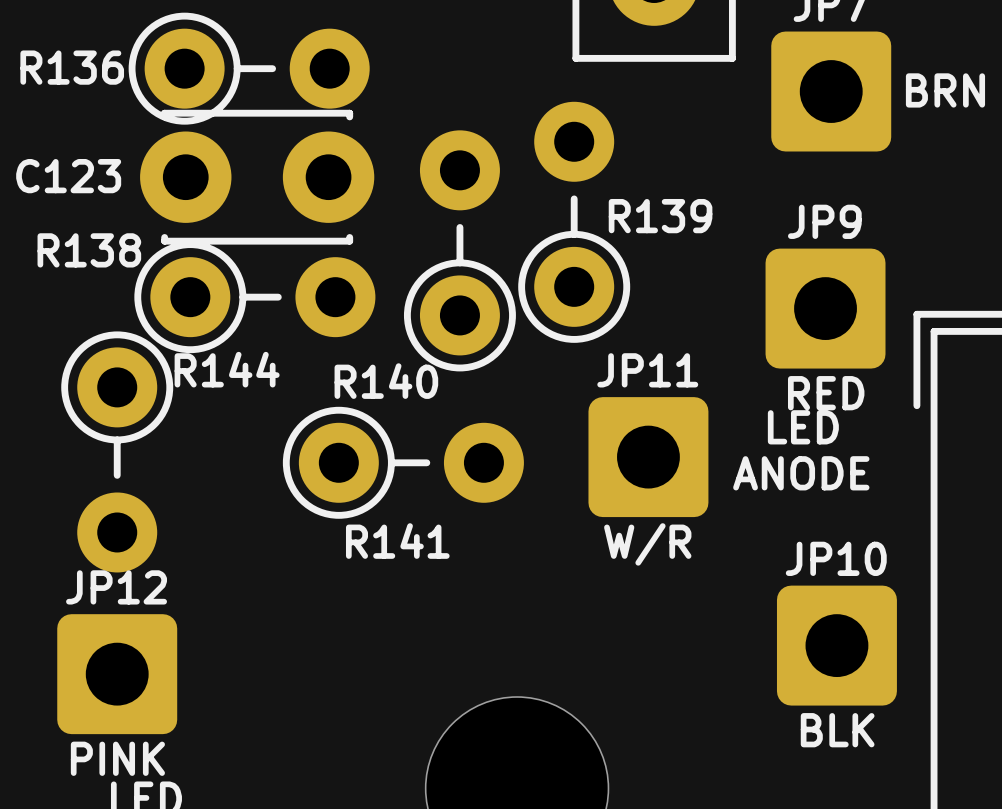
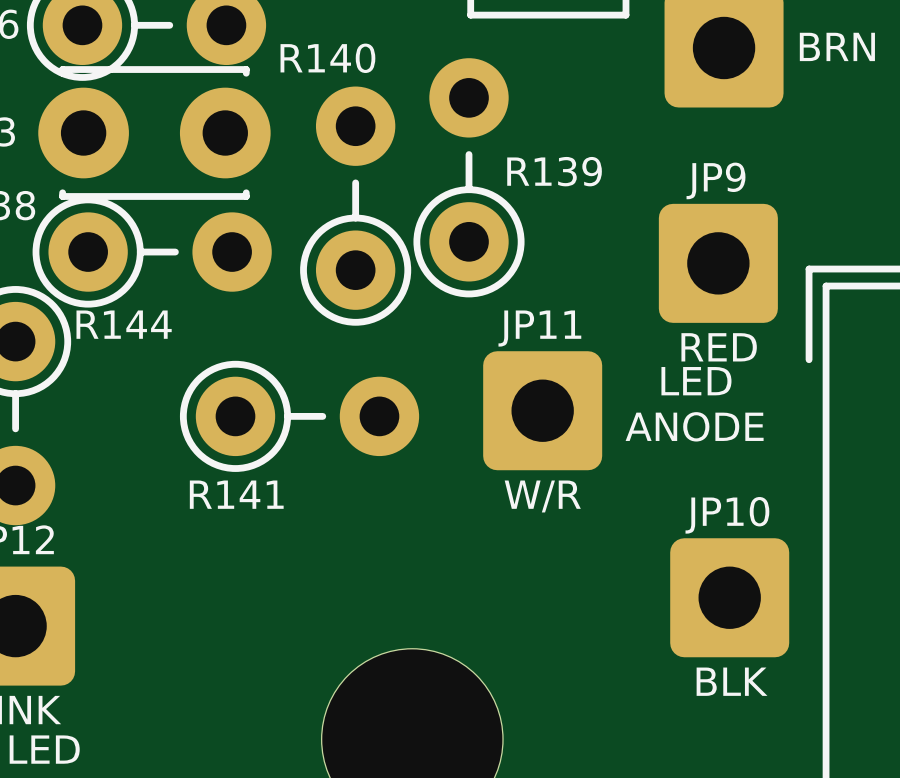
R140 name position: R140 (386, 381) -> R140 (327, 58)
R141 name position: R141 (397, 541) -> R141 (236, 494)

